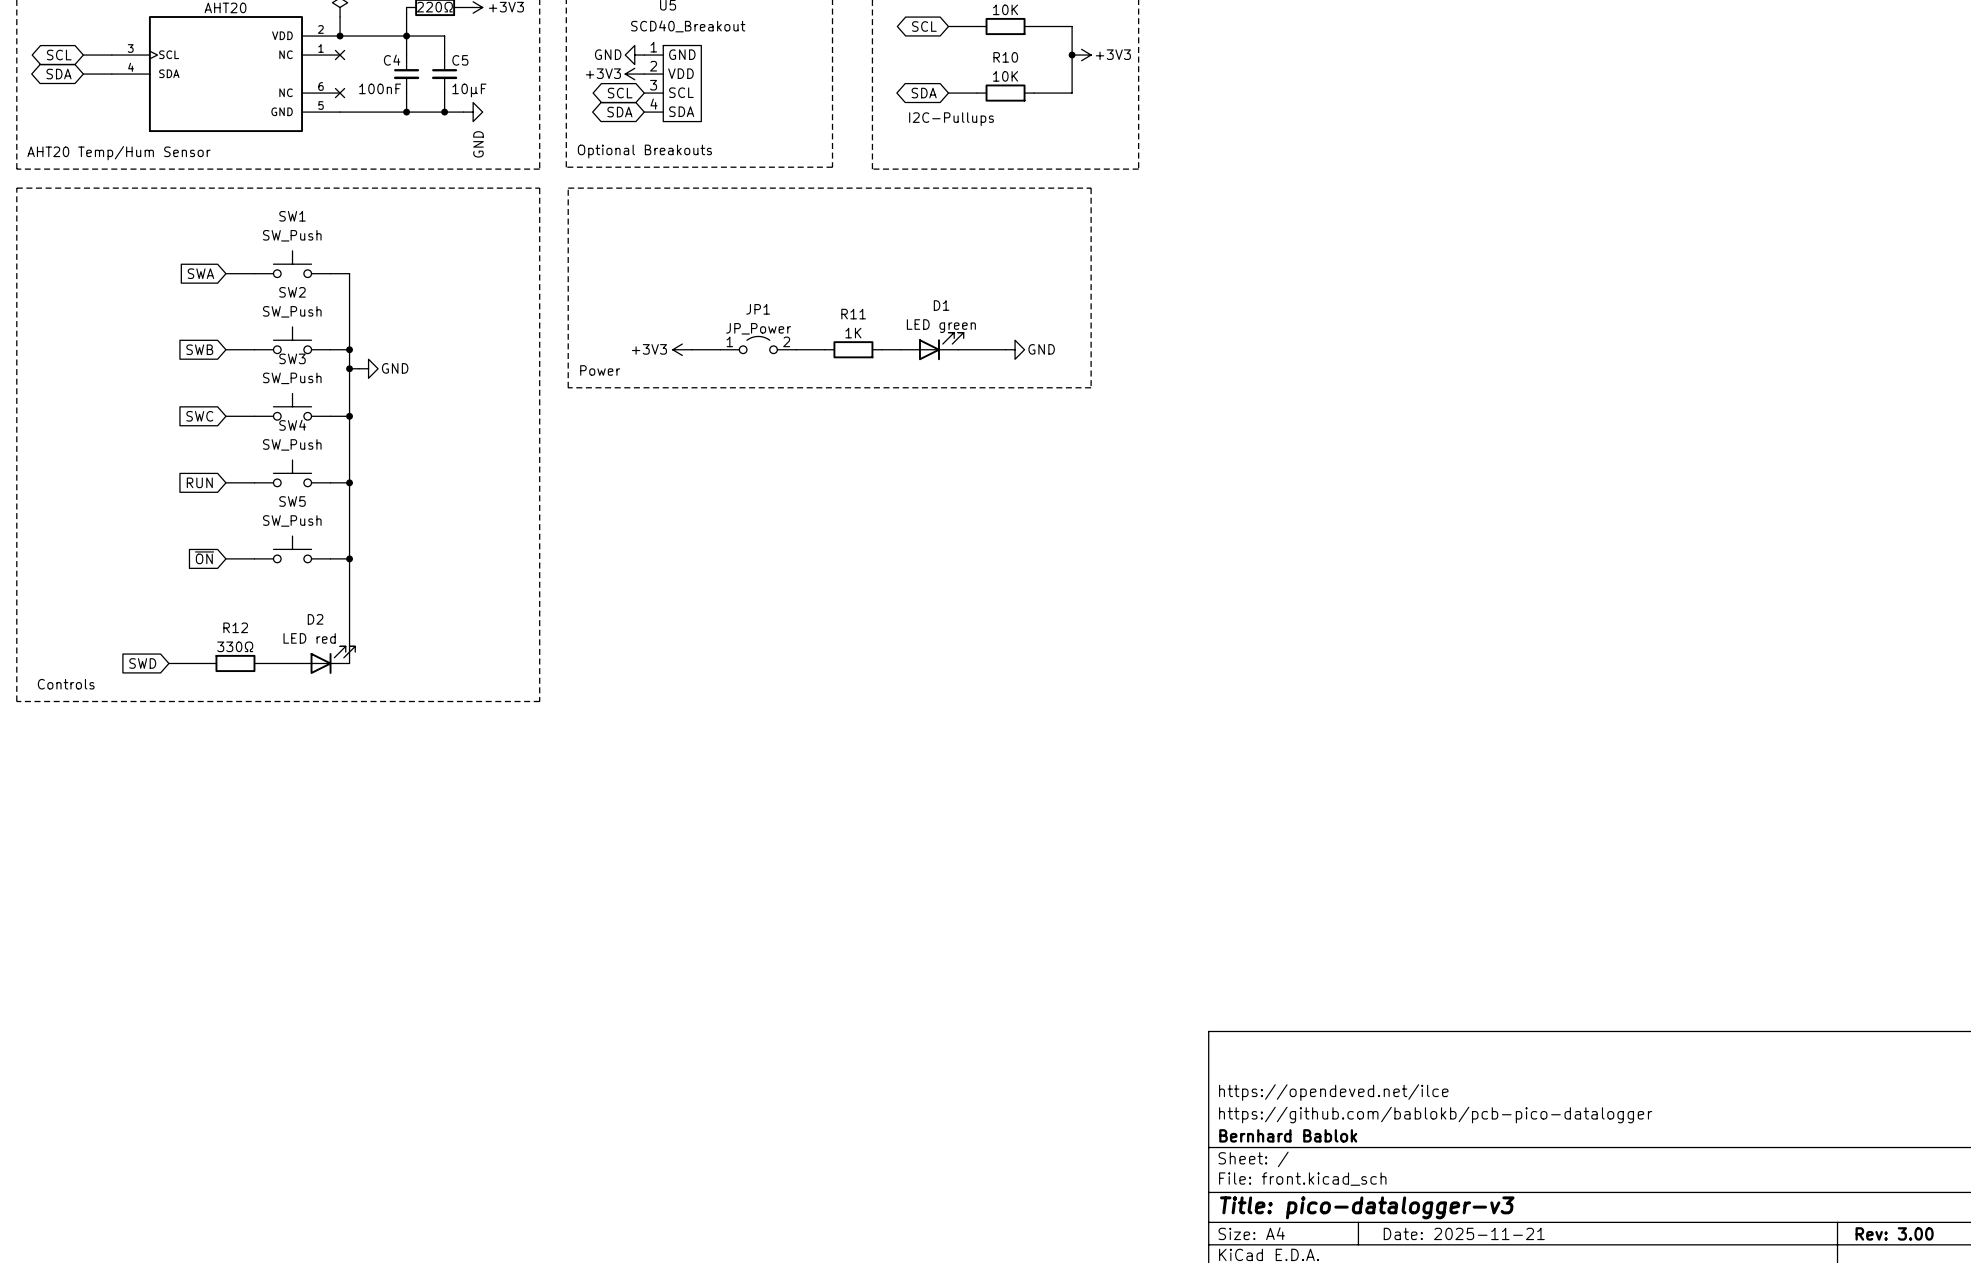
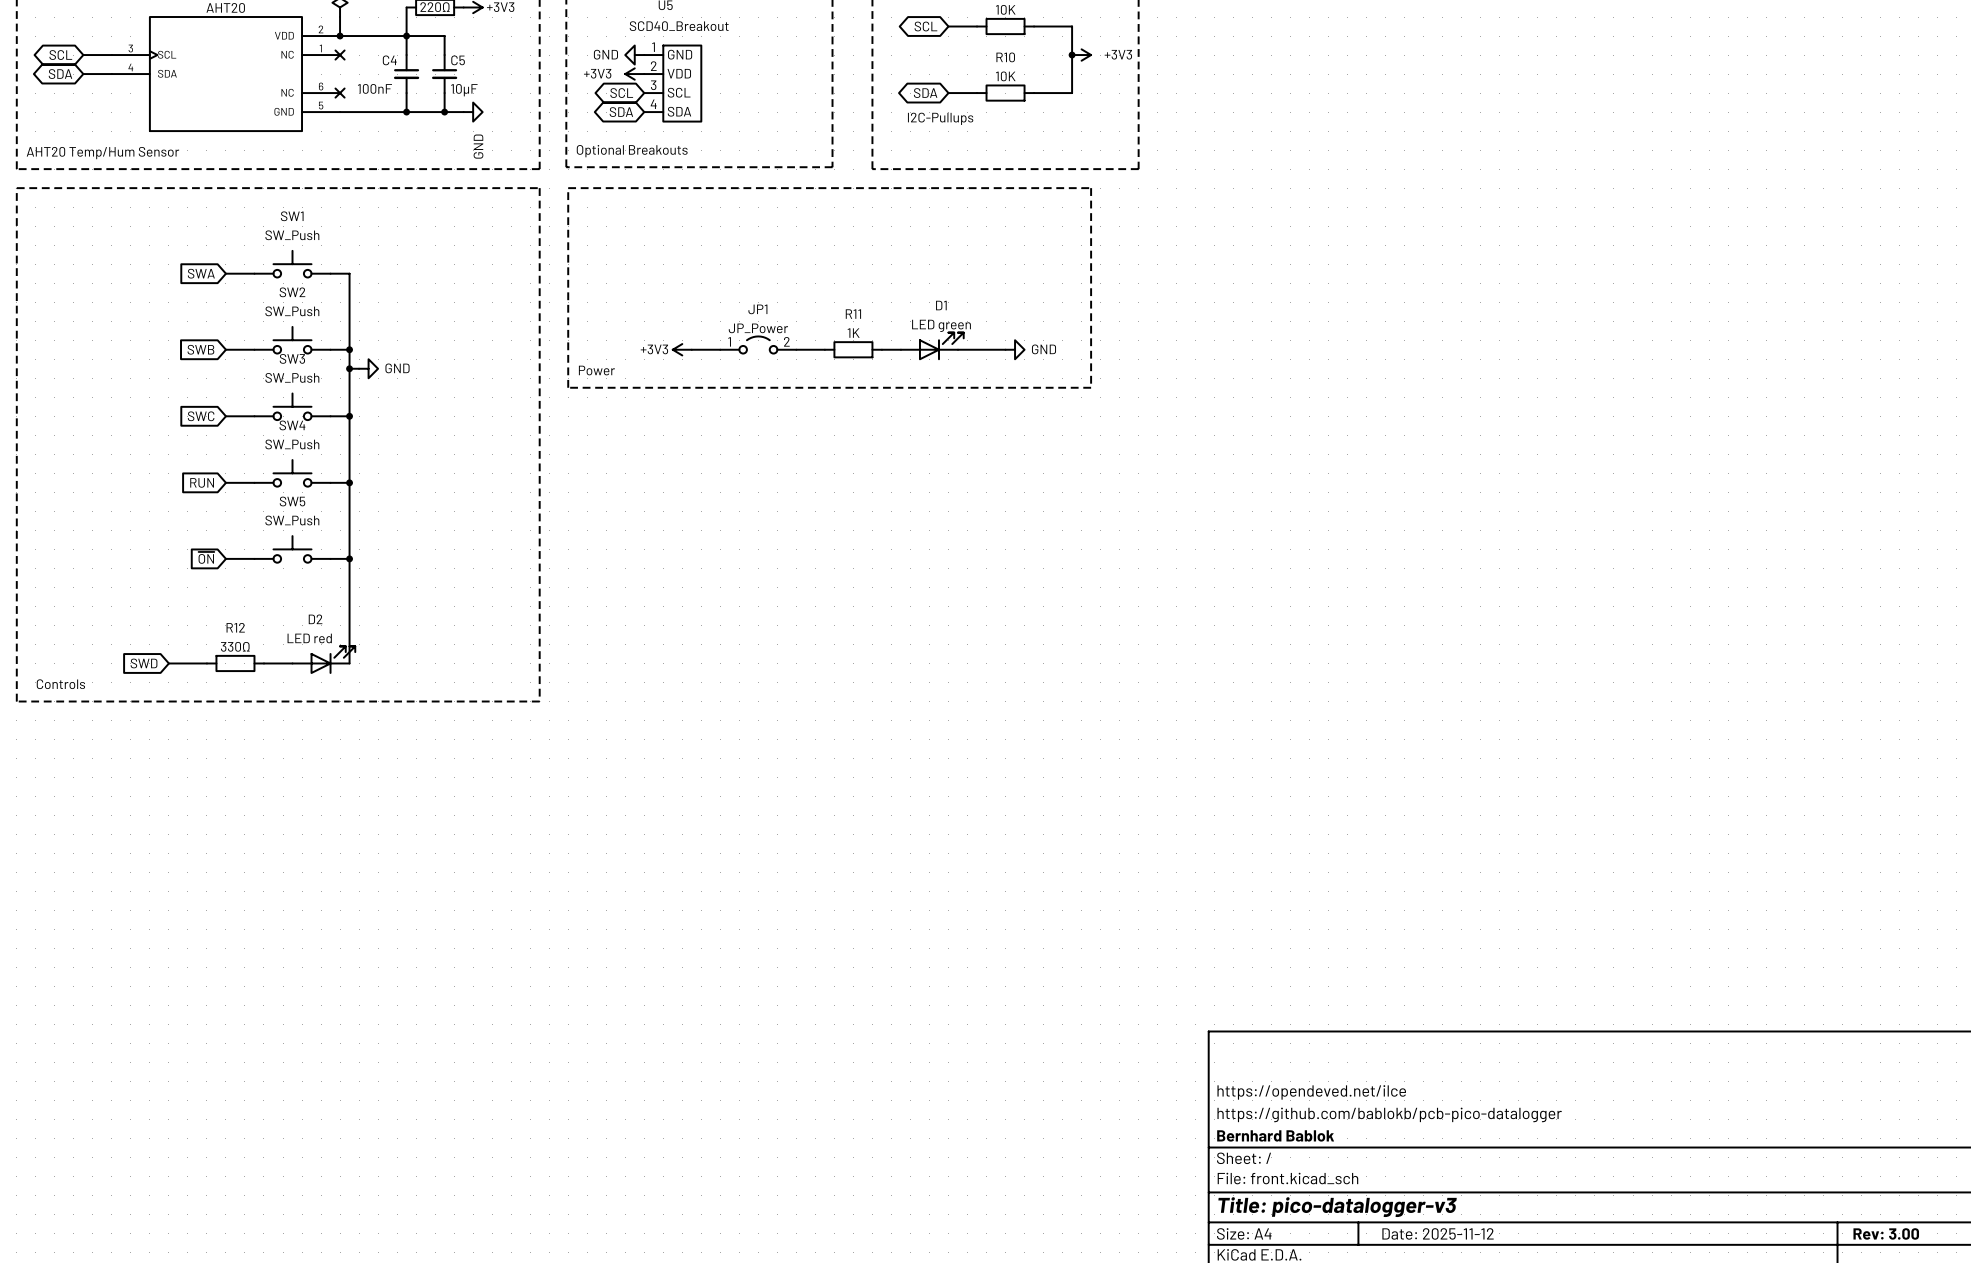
title block: Date: 2025-11-21 (1464, 1233) -> Date: 2025-11-12 (1438, 1233)

